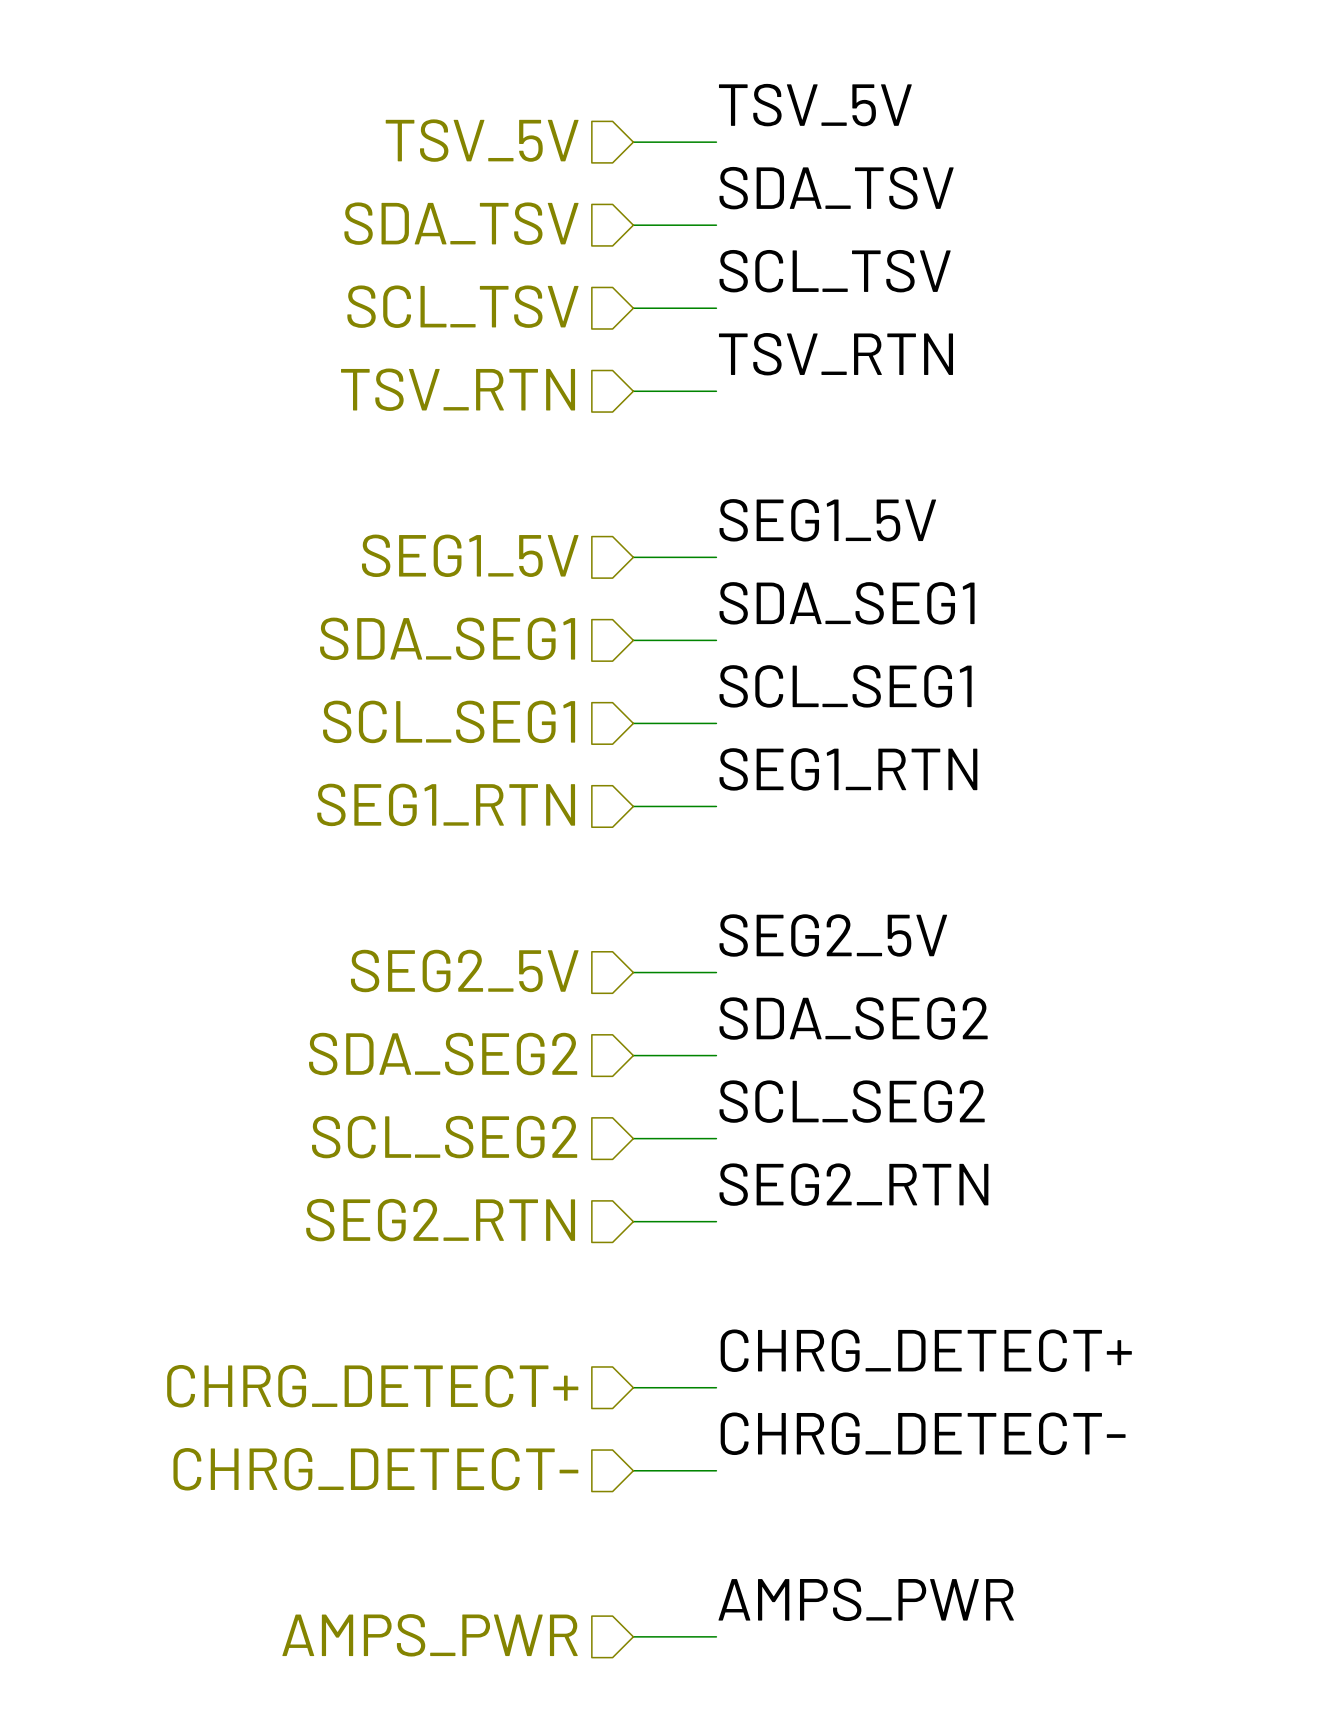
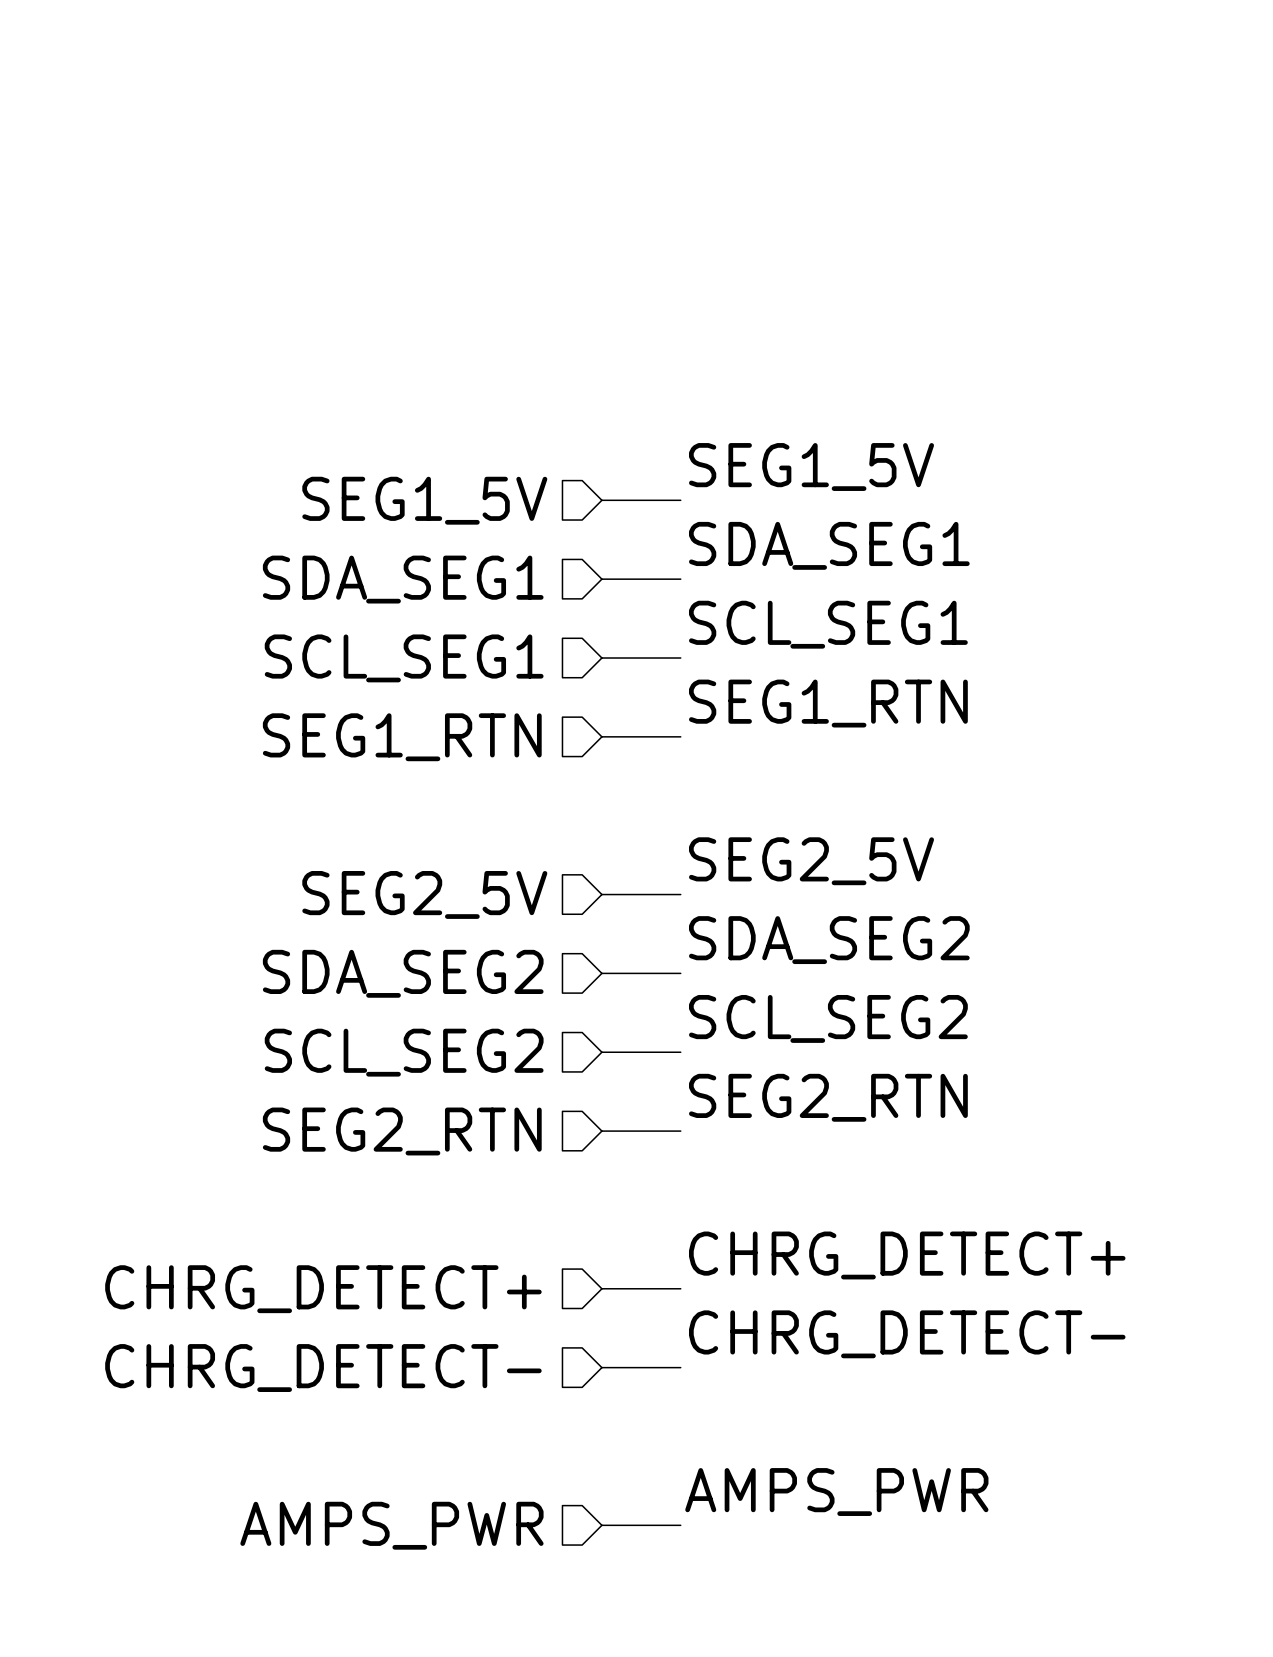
label: TSV_5V (815, 105) -> none
hierarchical label: TSV_5V (482, 140) -> none
wire: (633, 142) (716, 142) -> none
label: SDA_TSV (836, 188) -> none
hierarchical label: SDA_TSV (461, 223) -> none
wire: (633, 225) (716, 225) -> none
label: SCL_TSV (835, 271) -> none
hierarchical label: SCL_TSV (463, 306) -> none
wire: (633, 308) (716, 308) -> none
label: TSV_RTN (835, 354) -> none
hierarchical label: TSV_RTN (458, 389) -> none
wire: (633, 391) (716, 391) -> none

